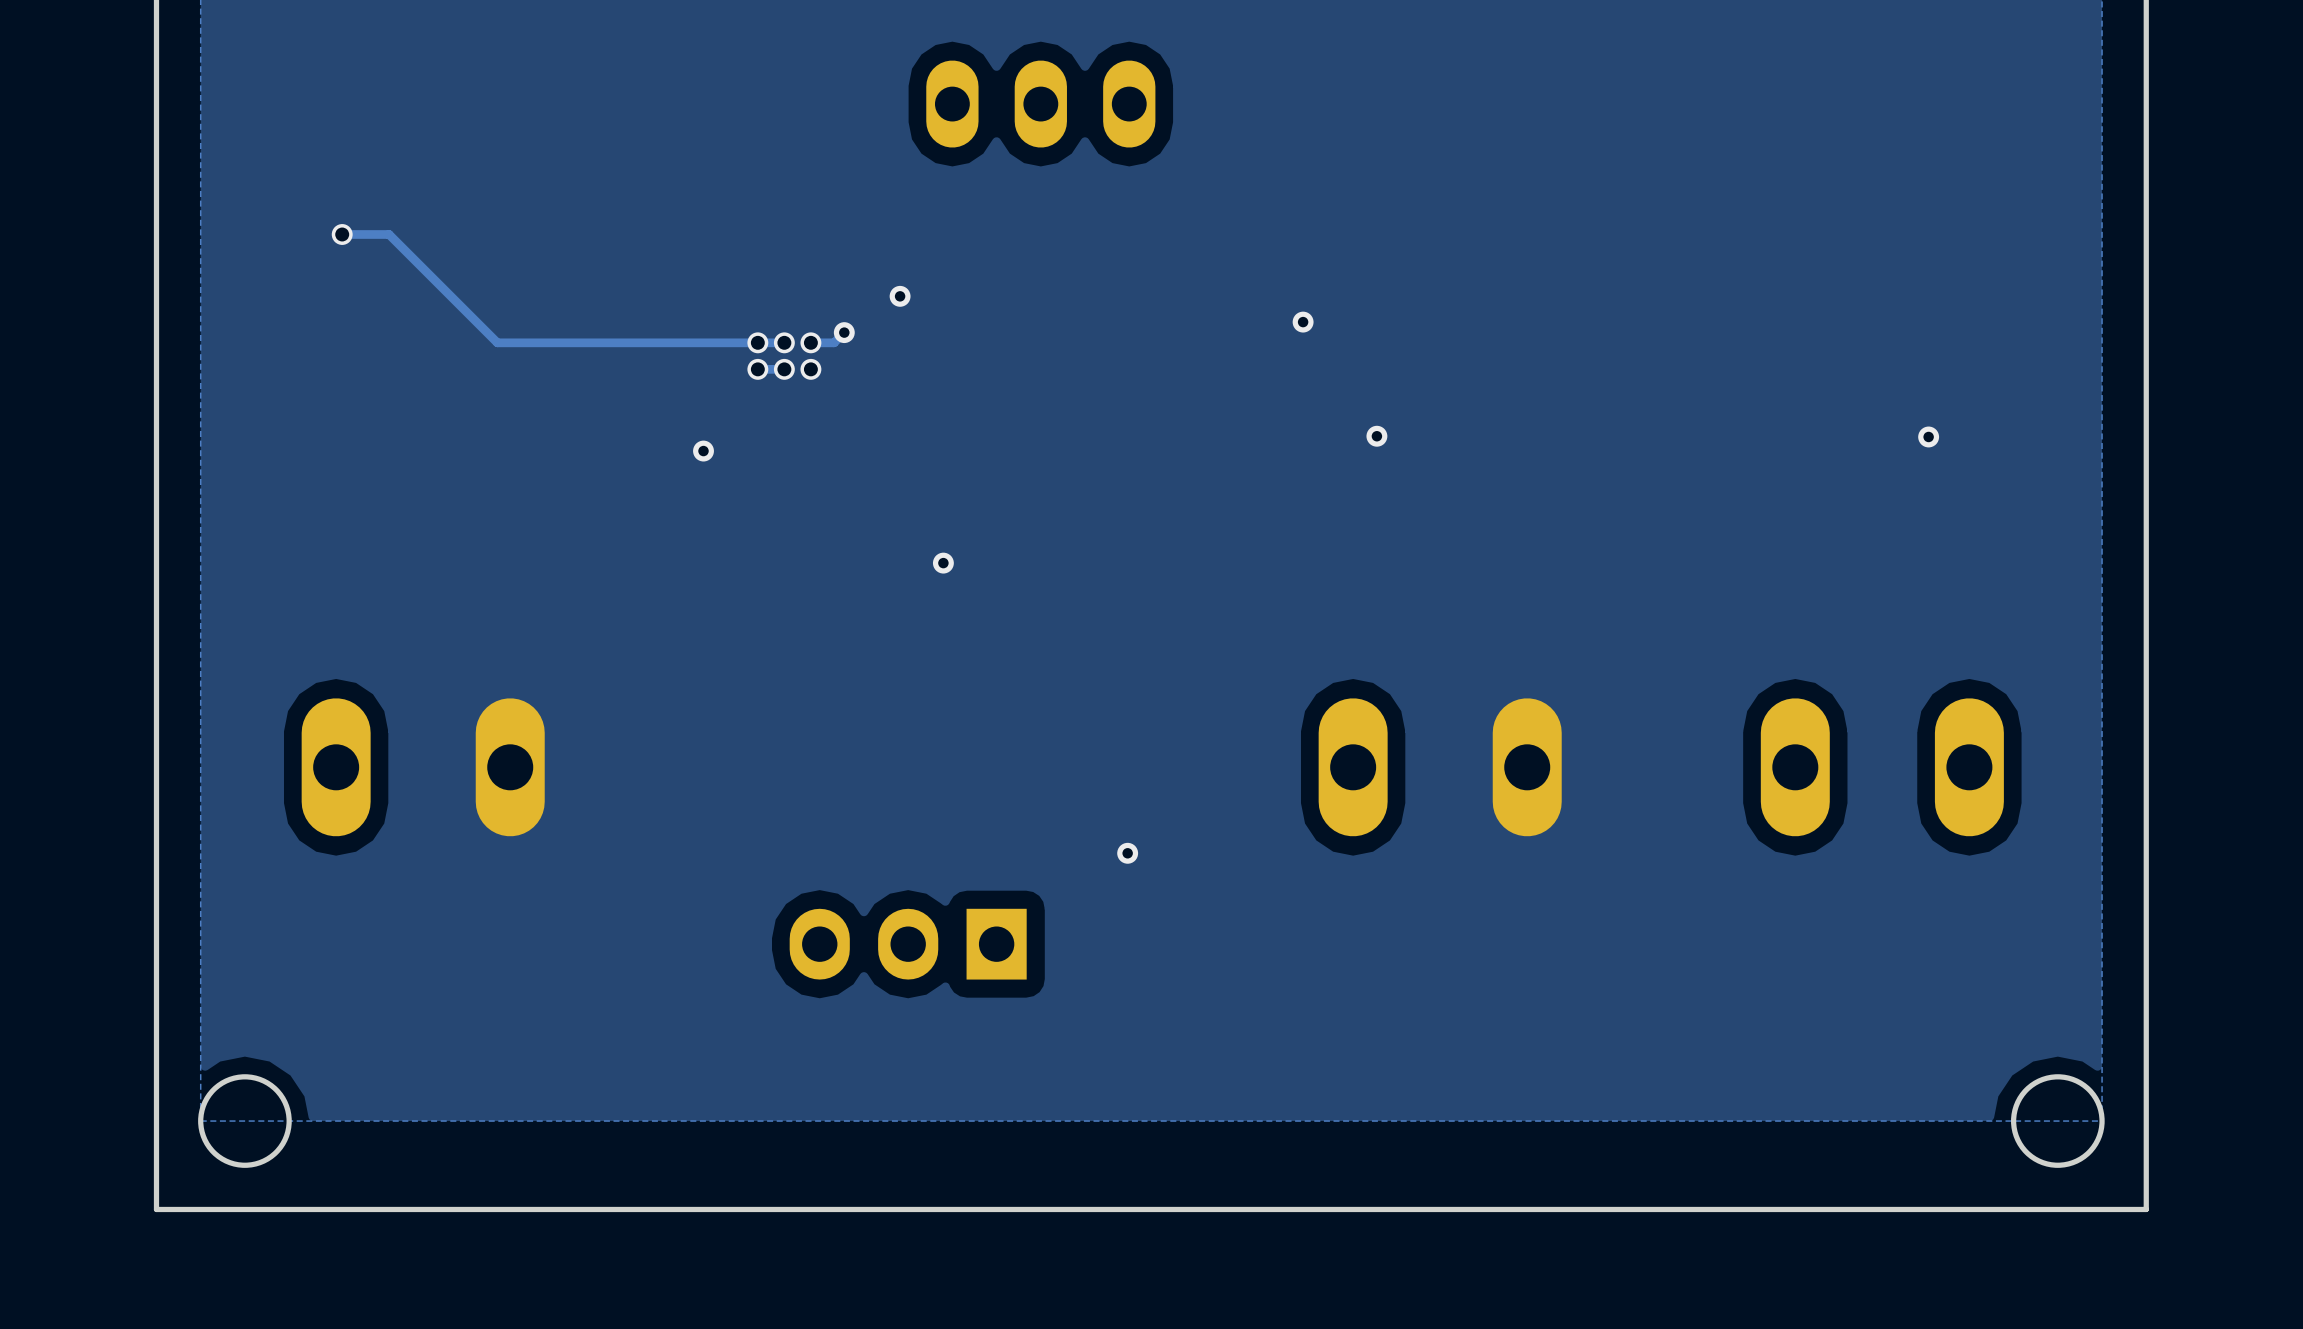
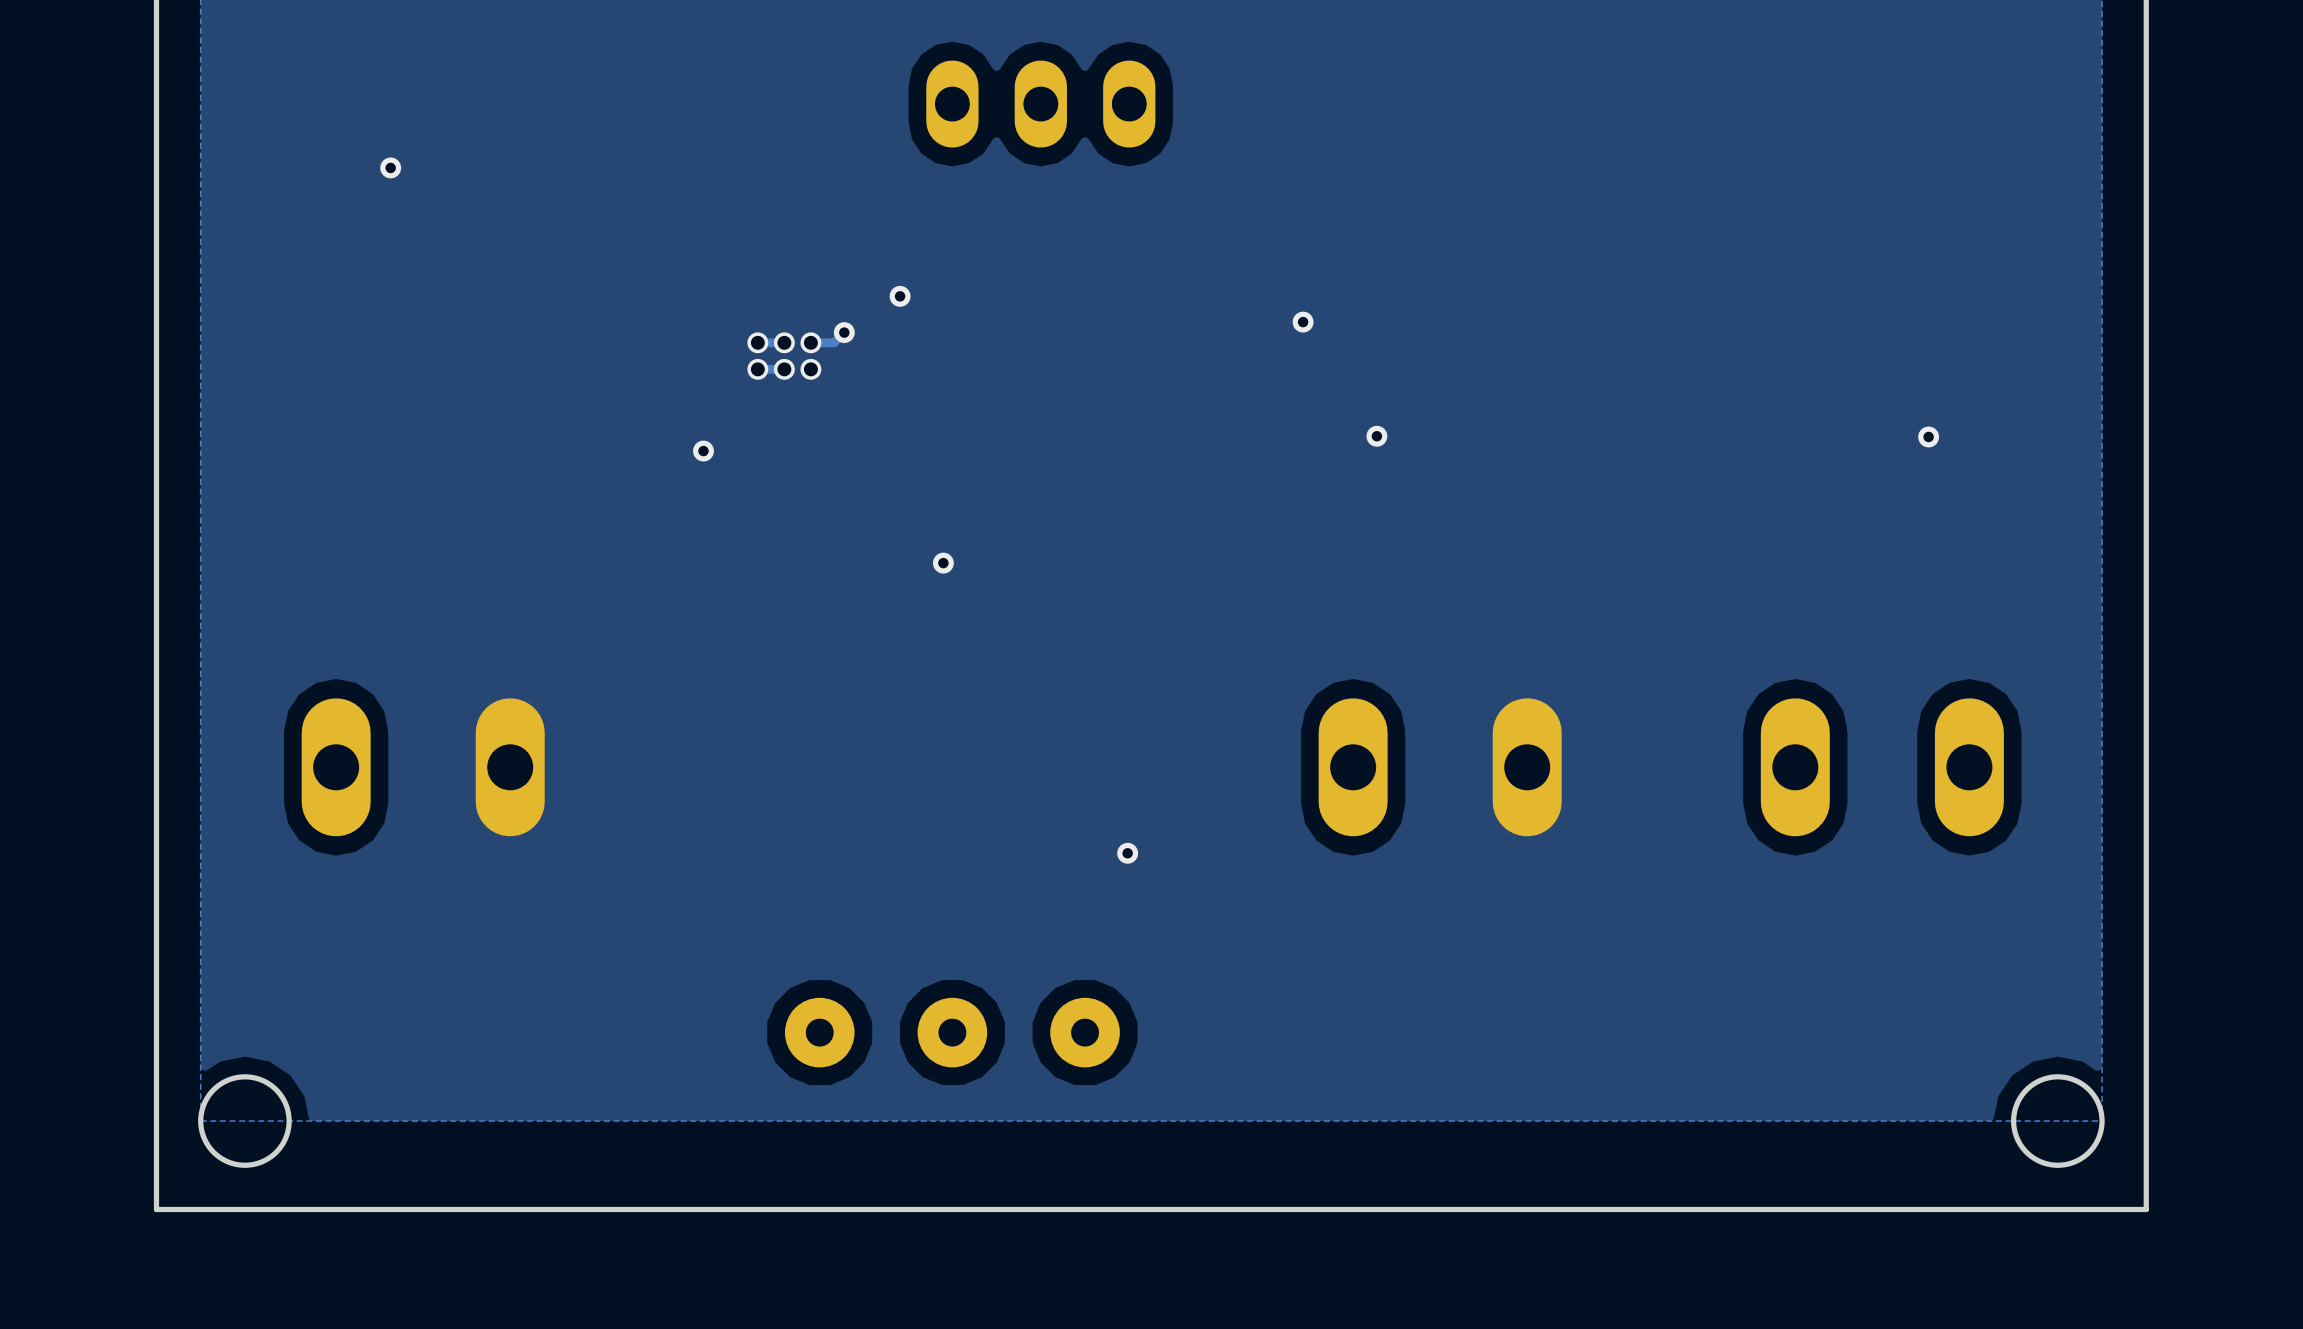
via: none -> (390, 167)
track: (342, 234) (389, 234) (497, 342) (757, 342) -> none
via: (342, 234) -> none
part: (908, 944) -> none
part: none -> (819, 1032)
part: none -> (952, 1032)
part: none -> (1085, 1032)

